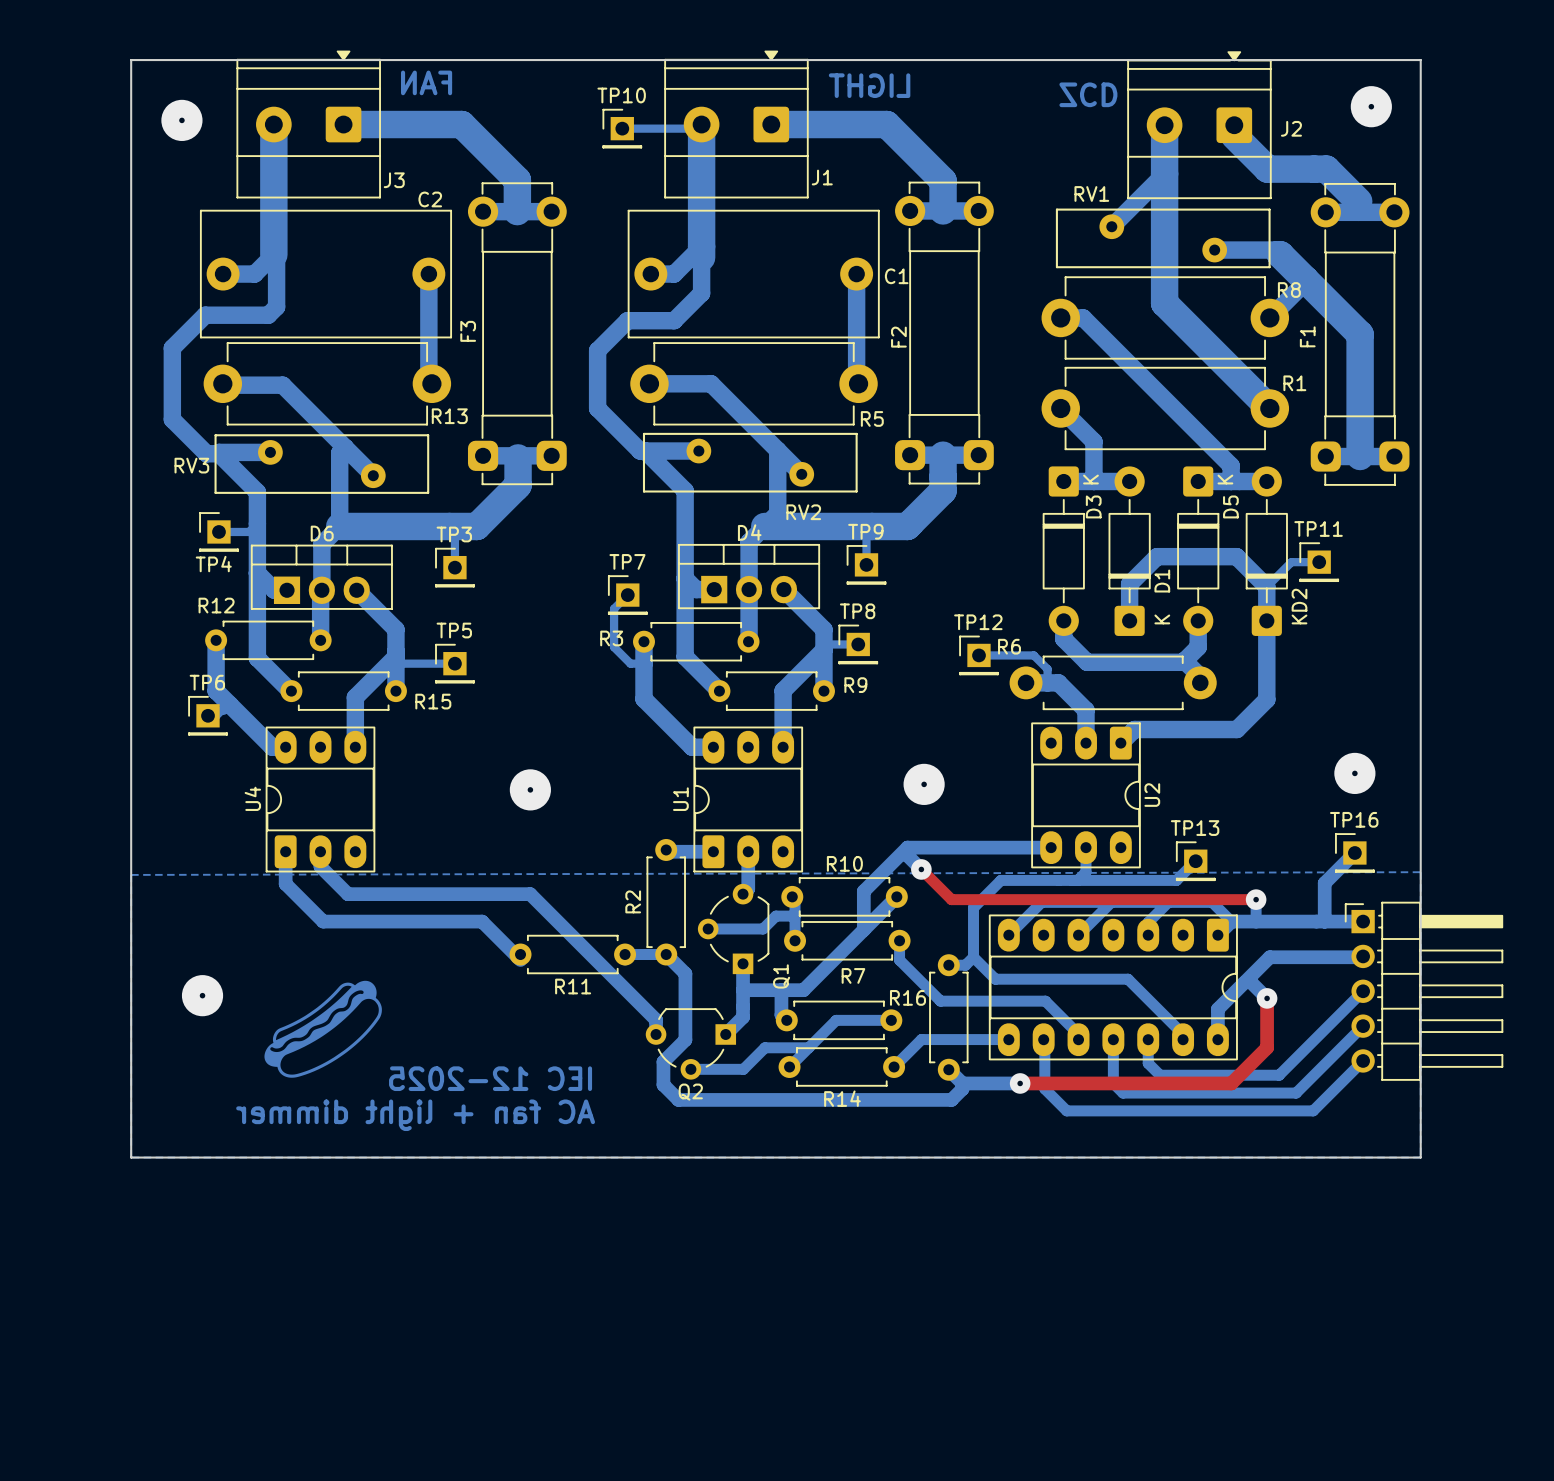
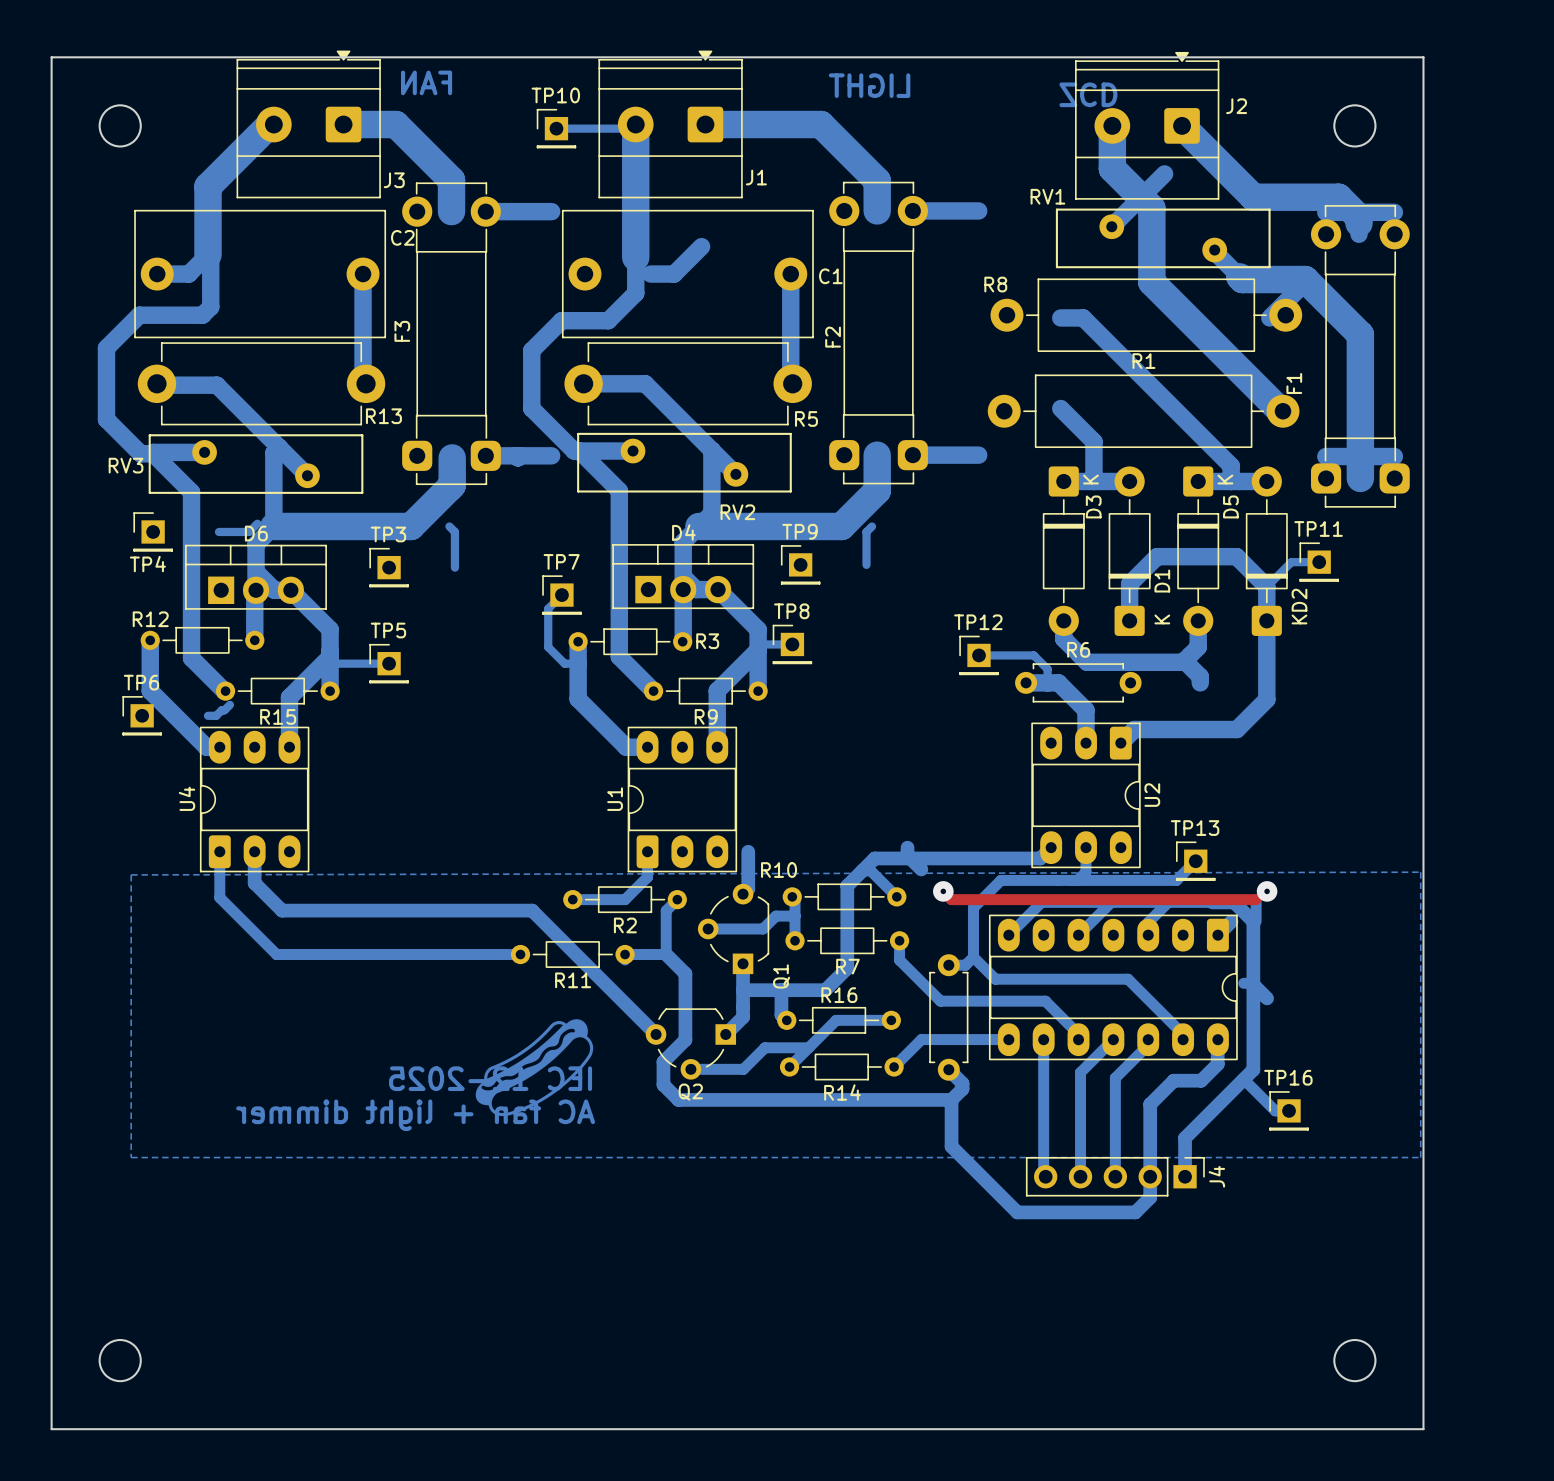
board edge: (131, 60) (1420, 60) (1420, 1157) (131, 1157) (131, 60) -> (51, 57) (51, 1429) (1423, 1429) (1423, 57) (51, 57)
round board edge: none -> [98, 104, 142, 148]
round board edge: none -> [1333, 104, 1377, 148]
via: (1371, 106) -> none
via: (181, 120) -> none
bottom track: none -> (270, 124) (208, 186) (208, 254)
bottom track: (273, 124) (273, 254) -> none
bottom track: (395, 124) (461, 124) (517, 180) (517, 211) -> (395, 124) (451, 180) (451, 211)
bottom track: none -> (705, 124) (771, 124)
J1 position: (736, 124) -> (670, 124)
bottom track: (820, 124) (886, 124) (943, 180) (943, 210) -> (820, 124) (877, 180) (877, 210)
bottom track: none -> (1112, 125) (1112, 168) (1151, 208) (1151, 282) (1280, 411) (1283, 411)
bottom track: none -> (1182, 125) (1253, 197) (1338, 197) (1359, 217) (1359, 234)
J2 position: (1199, 125) -> (1147, 125)
bottom track: (1234, 125) (1234, 135) (1267, 169) (1326, 169) (1358, 201) (1358, 212) -> none
bottom track: (1161, 127) (1164, 125) (1164, 303) (1269, 408) -> none
bottom track: none -> (556, 128) (622, 128)
TP10 position: (622, 128) -> (556, 128)
bottom track: (631, 128) (697, 128) (701, 124) (701, 293) (674, 320) (627, 320) (597, 350) (597, 408) (640, 451) (698, 451) -> (631, 128) (635, 124) (635, 293) (608, 320) (561, 320) (531, 350) (531, 408) (574, 451) (633, 451)
J2 name position: J2 (1291, 128) -> J2 (1236, 106)
RV1 name position: RV1 (1091, 193) -> RV1 (1047, 196)
C2 name position: C2 (430, 199) -> C2 (402, 237)
bottom track: (1214, 250) (1275, 250) (1305, 279) -> (1214, 250) (1242, 279) (1305, 279)
bottom track: (273, 254) (254, 274) (223, 274) -> (208, 254) (188, 274) (157, 274)
bottom track: (273, 254) (276, 257) (276, 306) (268, 315) (205, 315) (172, 348) (172, 419) (206, 453) (218, 453) -> (208, 254) (210, 257) (210, 306) (202, 315) (139, 315) (106, 348) (106, 419) (140, 453) (153, 453)
C2 position: (325, 274) -> (260, 274)
bottom track: (428, 274) (428, 380) (431, 383) -> (363, 274) (363, 380) (366, 383)
C1 position: (753, 274) -> (687, 274)
bottom track: (856, 274) (856, 381) (858, 383) -> (790, 274) (790, 381) (792, 383)
R8 footprint: [1041, 276, 1290, 360] -> [990, 278, 1303, 352]
R8 name position: R8 (1289, 290) -> R8 (995, 284)
F3 position: (517, 333) -> (451, 333)
F2 position: (944, 333) -> (878, 333)
bottom track: (1360, 334) (1360, 456) -> (1360, 334) (1360, 478)
F1 position: (1360, 334) -> (1360, 356)
F1 name position: F1 (1307, 336) -> F1 (1294, 383)
R1 footprint: [1041, 366, 1290, 451] -> [987, 374, 1300, 449]
bottom track: (222, 383) (282, 385) (373, 475) -> (156, 383) (216, 385) (307, 475)
R13 position: (327, 383) -> (261, 383)
bottom track: (649, 383) (711, 383) (801, 474) -> (583, 383) (645, 383) (735, 474)
R5 position: (754, 383) -> (688, 383)
R1 name position: R1 (1294, 383) -> R1 (1143, 361)
bottom track: none -> (279, 447) (273, 453) (273, 526)
bottom track: (345, 447) (339, 453) (339, 526) (321, 544) (320, 640) -> none
bottom track: (777, 450) (777, 513) (749, 542) (748, 641) -> (711, 450) (711, 513) (683, 542) (682, 641)
bottom track: (645, 451) (685, 490) (685, 656) (719, 691) -> (579, 451) (619, 490) (619, 656) (653, 691)
bottom track: (218, 453) (257, 492) (257, 658) (291, 691) -> (153, 453) (191, 492) (191, 658) (225, 691)
bottom track: (269, 453) (270, 452) (218, 453) -> (203, 453) (204, 452) (153, 453)
bottom track: (943, 455) (943, 490) (907, 526) (841, 526) -> (877, 455) (877, 490) (841, 526)
bottom track: (518, 457) (518, 485) (476, 526) (411, 526) -> (452, 457) (452, 485) (411, 526)
RV2 position: (750, 462) -> (684, 462)
RV3 position: (321, 464) -> (256, 464)
bottom track: none -> (273, 526) (256, 544) (254, 640)
bottom track: none -> (273, 526) (339, 526)
bottom track: none -> (698, 526) (764, 526)
TP4 position: (218, 531) -> (153, 531)
TP9 position: (866, 564) -> (800, 564)
TP3 position: (454, 567) -> (389, 567)
D4 position: (749, 576) -> (683, 576)
D6 position: (321, 577) -> (256, 577)
bottom track: (783, 589) (823, 629) (823, 691) -> (718, 589) (758, 629) (758, 691)
bottom track: (356, 590) (395, 629) (395, 691) -> (290, 590) (330, 629) (330, 691)
bottom track: (627, 595) (614, 608) (614, 647) (630, 663) (643, 663) -> (561, 595) (548, 608) (548, 647) (564, 663) (578, 663)
TP7 position: (627, 595) -> (561, 595)
R12 footprint: [205, 620, 332, 660] -> [140, 626, 265, 654]
R3 footprint: [633, 622, 760, 662] -> [568, 628, 693, 656]
R3 name position: R3 (611, 638) -> R3 (707, 641)
bottom track: (216, 640) (216, 690) (272, 747) (285, 747) -> (150, 640) (150, 690) (206, 747) (219, 747)
bottom track: (643, 641) (643, 699) (692, 747) (713, 747) -> (578, 641) (578, 699) (626, 747) (647, 747)
bottom track: (858, 644) (829, 644) (783, 690) (783, 747) -> (792, 644) (763, 644) (717, 690) (717, 747)
TP8 position: (858, 644) -> (792, 644)
R6 name position: R6 (1009, 646) -> R6 (1078, 649)
R6 footprint: [1009, 655, 1217, 711] -> [1015, 663, 1142, 703]
bottom track: (454, 663) (402, 663) (395, 656) (355, 697) (355, 747) -> (389, 663) (336, 663) (330, 656) (289, 697) (289, 747)
TP5 position: (454, 663) -> (389, 663)
R15 footprint: [280, 671, 407, 711] -> [215, 677, 340, 705]
R9 footprint: [708, 671, 835, 711] -> [643, 677, 768, 705]
R9 name position: R9 (855, 685) -> R9 (706, 716)
R15 name position: R15 (433, 701) -> R15 (278, 716)
TP6 position: (208, 715) -> (142, 715)
via: (1354, 773) -> none
via: (924, 784) -> none
via: (530, 789) -> none
U4 position: (320, 799) -> (254, 799)
U1 position: (748, 799) -> (682, 799)
R2 footprint: [646, 839, 686, 966] -> [563, 886, 687, 914]
bottom track: (1051, 847) (907, 847) (863, 891) (863, 929) -> (1051, 847) (1040, 858) (874, 858) (847, 885) (847, 968) (825, 990) (803, 990)
bottom track: (666, 849) (667, 851) (713, 851) -> none
bottom track: none -> (219, 851) (219, 897) (276, 954) (520, 954)
bottom track: (285, 851) (285, 883) (323, 921) (482, 921) (520, 959) -> none
bottom track: (320, 851) (320, 866) (347, 894) (530, 894) (656, 1019) (656, 1034) -> (254, 851) (254, 883) (282, 910) (532, 910) (656, 1034)
bottom track: none -> (647, 851) (647, 877) (625, 899) (572, 899)
bottom track: (1354, 852) (1324, 883) (1324, 921) -> none
TP16 position: (1354, 852) -> (1289, 1110)
R10 name position: R10 (844, 863) -> R10 (779, 870)
top track: (921, 869) (943, 891) -> none
via position: (921, 869) -> (943, 891)
R10 footprint: [781, 877, 908, 917] -> [782, 883, 907, 911]
bottom track: (896, 896) (803, 990) -> (896, 896) (870, 870) (862, 870)
bottom track: none -> (677, 899) (666, 910) (666, 954)
via position: (1256, 899) -> (1267, 891)
R2 name position: R2 (633, 901) -> R2 (625, 925)
bottom track: (1212, 902) (1231, 921) (1363, 921) -> (1212, 902) (1234, 902) (1253, 921) (1253, 1069) (1185, 1138) (1185, 1176)
R7 footprint: [784, 921, 911, 961] -> [785, 927, 910, 955]
R11 footprint: [509, 934, 637, 975] -> [510, 941, 635, 968]
bottom track: (1363, 956) (1269, 957) (1217, 1009) (1217, 1039) -> (951, 1099) (951, 1146) (1017, 1212) (1135, 1212) (1150, 1197) (1150, 1104) (1173, 1080) (1201, 1080) (1217, 1064) (1217, 1039)
bottom track: (1363, 991) (1279, 1075) (1160, 1075) (1148, 1063) (1148, 1045) -> (1115, 1176) (1115, 1078) (1148, 1045)
part: (1424, 991) -> none
via: (202, 995) -> none
R16 name position: R16 (907, 997) -> R16 (839, 995)
top track: (1267, 998) (1267, 1047) (1231, 1083) (1020, 1083) -> none
via: (1267, 998) -> none
R16 footprint: [775, 1000, 903, 1040] -> [777, 1006, 901, 1034]
bottom track: (1363, 1026) (1296, 1093) (1123, 1093) (1113, 1083) (1113, 1039) -> (1080, 1176) (1080, 1072) (1113, 1039)
drawing position: (323, 1029) -> (534, 1067)
bottom track: none -> (1043, 1039) (1043, 1174) (1045, 1176)
bottom track: (1044, 1040) (1044, 1088) (1066, 1110) (1275, 1110) -> (1243, 1079) (1275, 1110)
R14 footprint: [778, 1047, 906, 1087] -> [779, 1053, 904, 1081]
bottom track: (1363, 1060) (1313, 1110) (1289, 1110) -> none
bottom track: (962, 1083) (1020, 1083) -> none
via: (1020, 1083) -> none
J4: none -> (1115, 1176)
round board edge: none -> [98, 1338, 142, 1383]
round board edge: none -> [1333, 1338, 1377, 1383]

